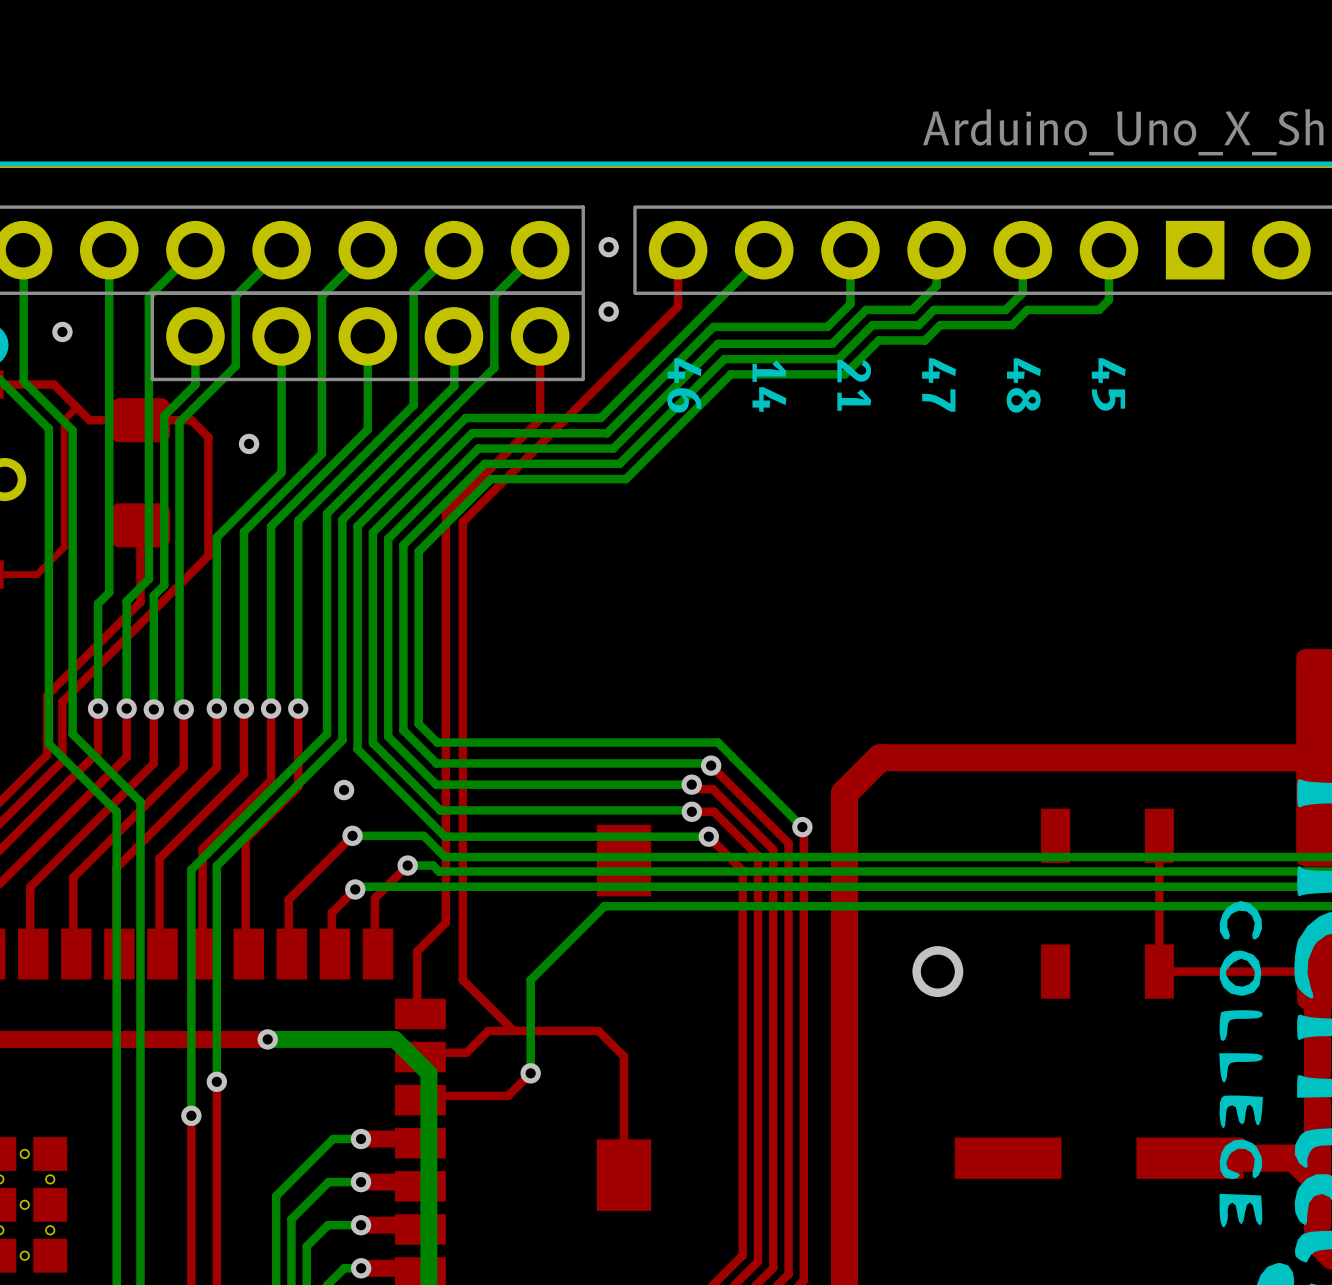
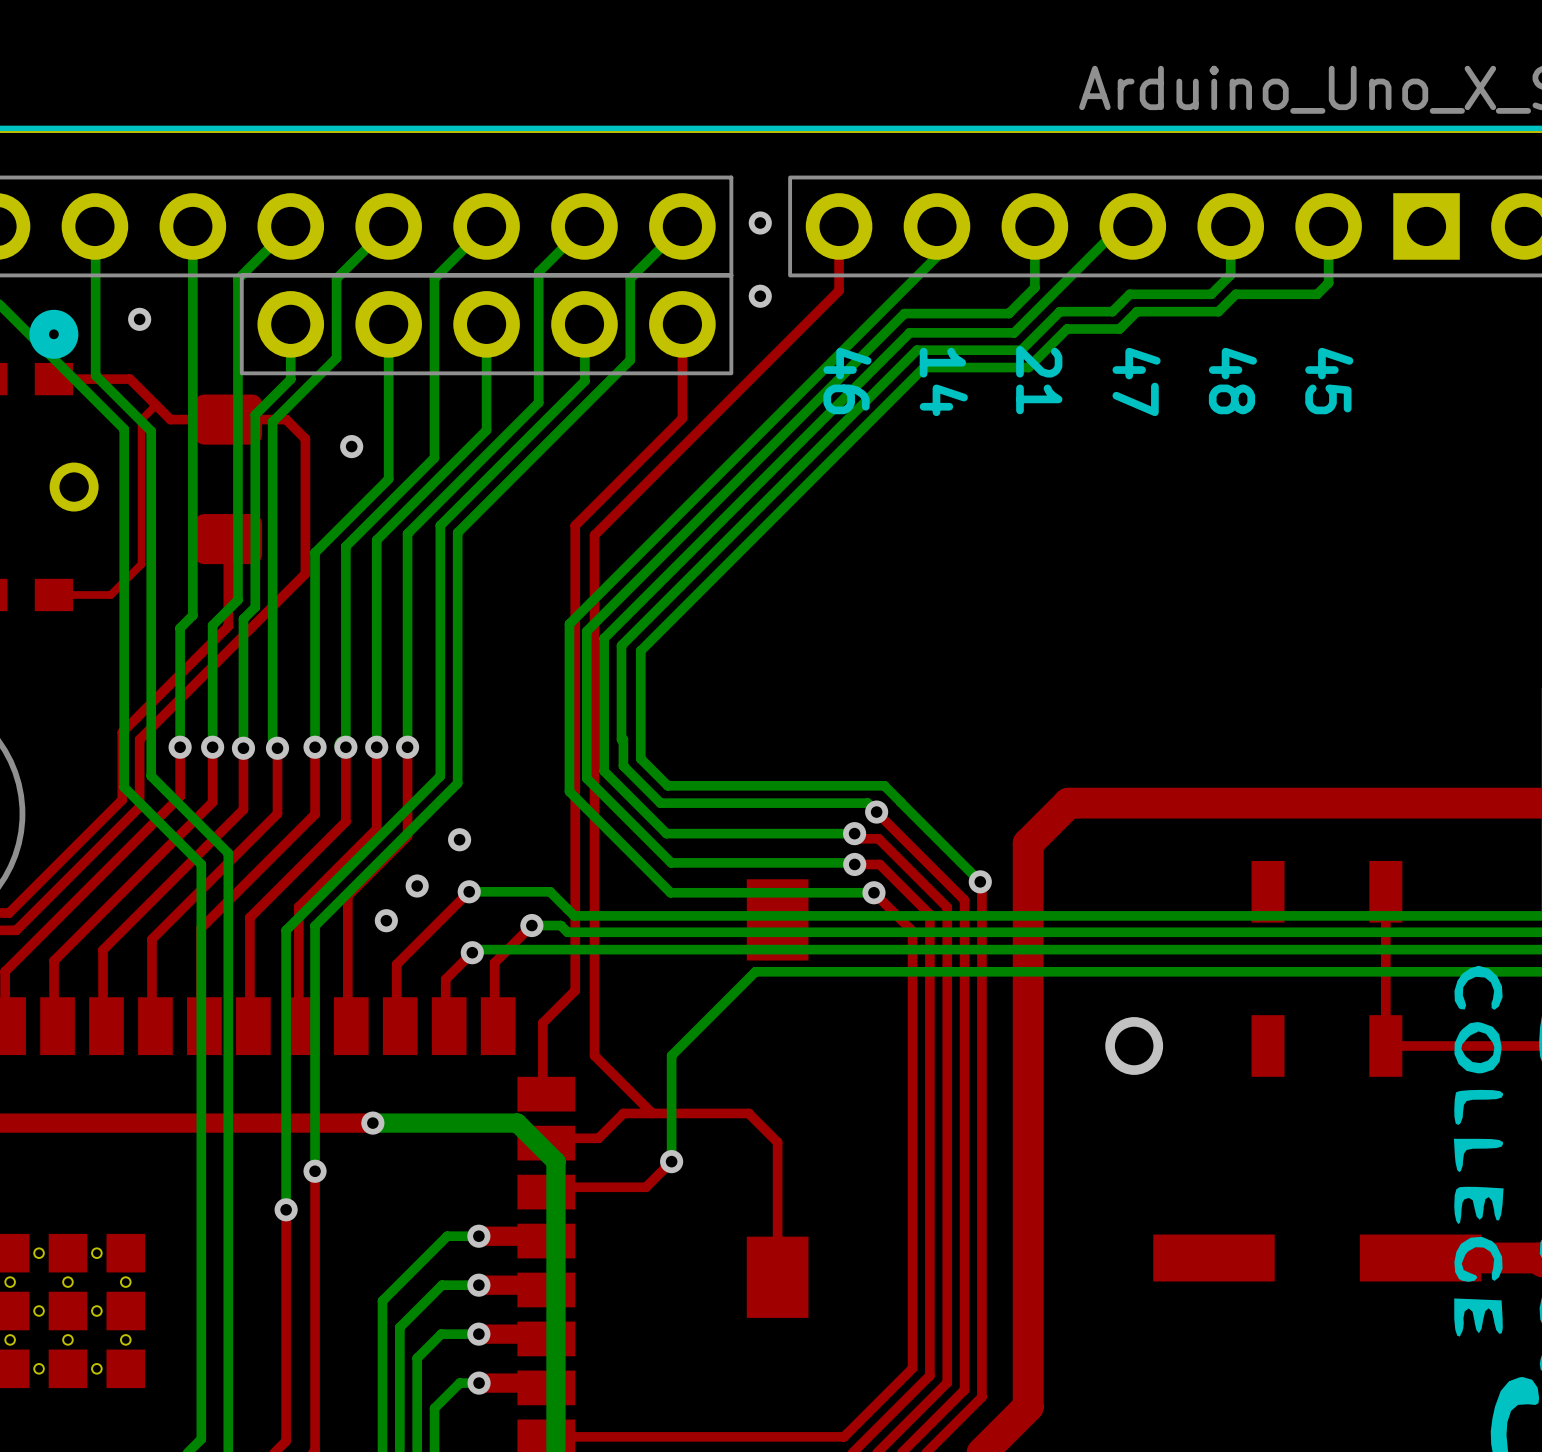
bottom track: (936, 250) (936, 285) (912, 309) (866, 309) -> (1132, 226) (1120, 226) (1052, 294)
bottom track: (764, 254) (600, 418) (465, 418) (357, 526) (357, 749) (444, 836) (529, 836) -> (936, 231) (936, 256) (569, 624) (569, 791) (670, 892)
bottom track: (735, 326) (713, 326) (607, 433) (472, 433) (372, 532) (372, 743) (440, 810) (530, 810) -> (904, 313) (586, 631) (586, 778) (671, 862)
bottom track: (740, 343) (718, 343) (613, 448) (478, 448) (388, 538) (388, 736) (436, 784) (526, 784) -> (909, 332) (604, 638) (604, 771) (666, 833)
bottom track: (746, 359) (724, 359) (619, 463) (484, 463) (403, 545) (403, 730) (436, 763) (708, 763) -> (916, 350) (621, 645) (621, 739) (623, 739) (623, 765) (660, 803) (867, 803) (874, 809)
bottom track: (752, 374) (730, 374) (625, 479) (491, 479) (418, 551) (418, 724) (437, 742) (527, 742) -> (924, 367) (640, 650) (640, 758) (667, 785)
via: none -> (417, 886)
via: none -> (386, 920)

